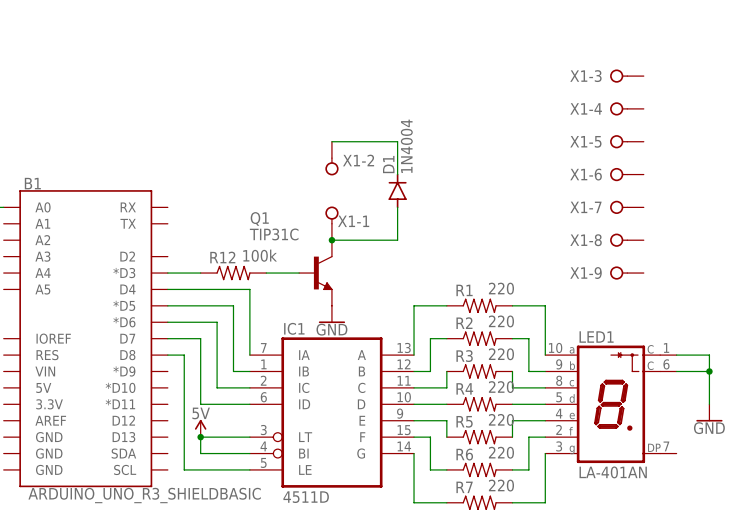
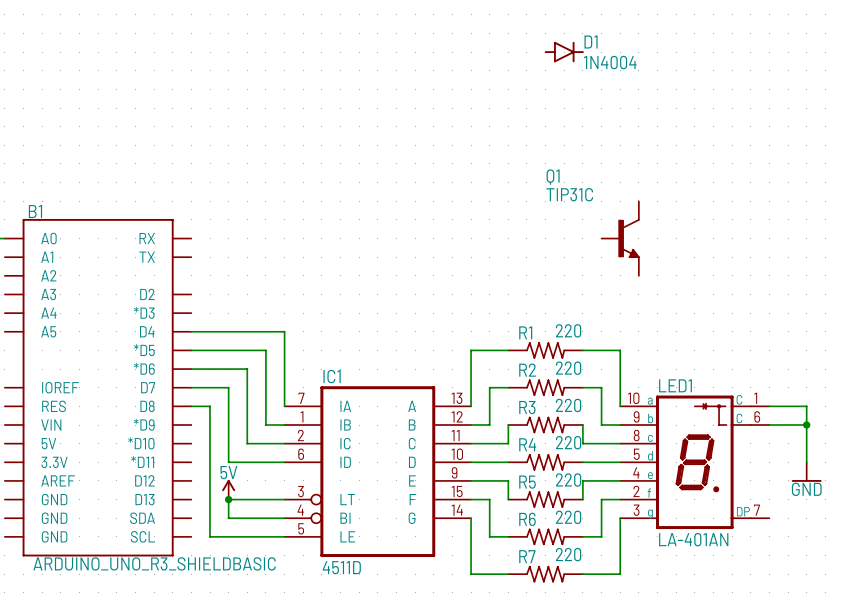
X1-3: (626, 76) -> none
X1-4: (626, 108) -> none
wire: (331, 141) (397, 141) (397, 174) -> none
X1-5: (626, 141) -> none
X1-2: (331, 158) -> none
X1-6: (626, 174) -> none
D1 rotation: 0° (397, 190) -> 90° clockwise (564, 52)
D1 position: (397, 190) -> (564, 52)
wire: (397, 207) (397, 240) (331, 240) -> none
X1-7: (626, 207) -> none
X1-1: (331, 223) -> none
junction: (331, 240) -> none
X1-8: (626, 240) -> none
wire: (167, 273) (200, 273) -> none
R12: 100k (233, 273) -> none
wire: (266, 273) (299, 273) -> none
Q1 position: (315, 273) -> (620, 238)
X1-9: (626, 273) -> none
power symbol: GND (331, 314) -> none

